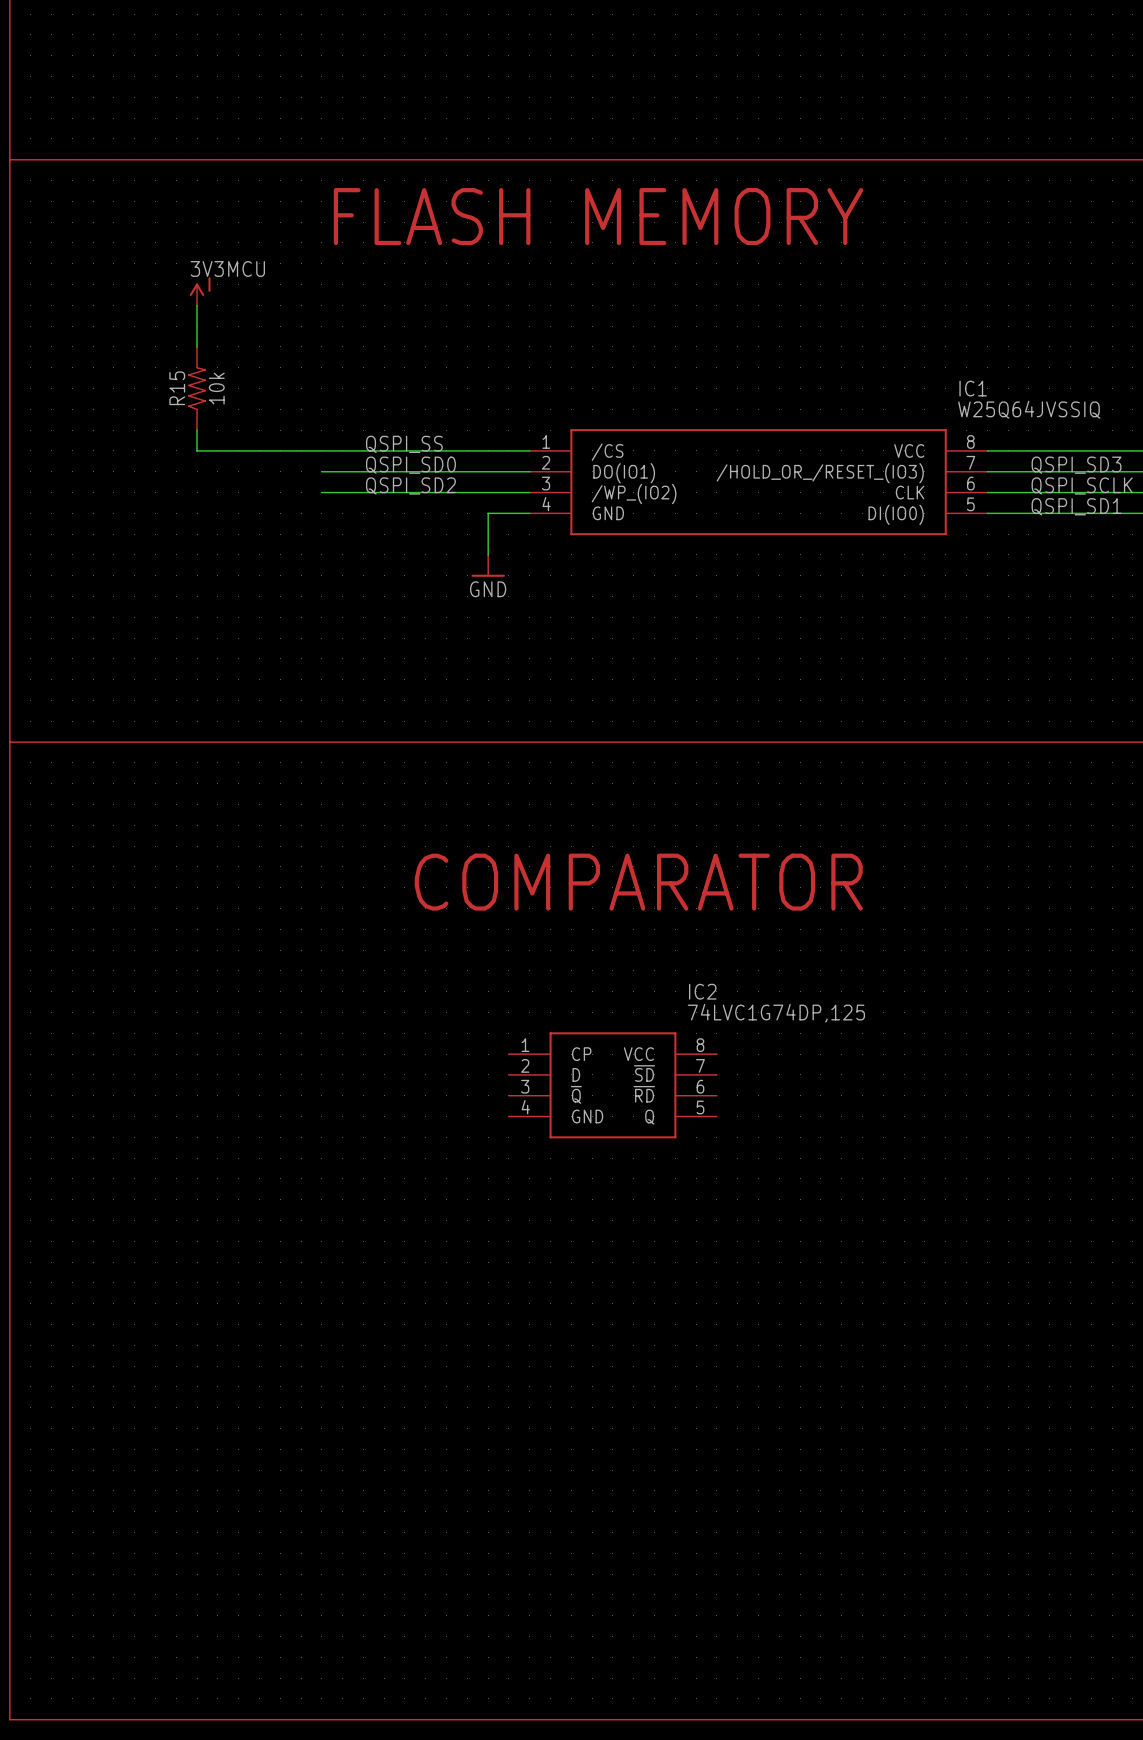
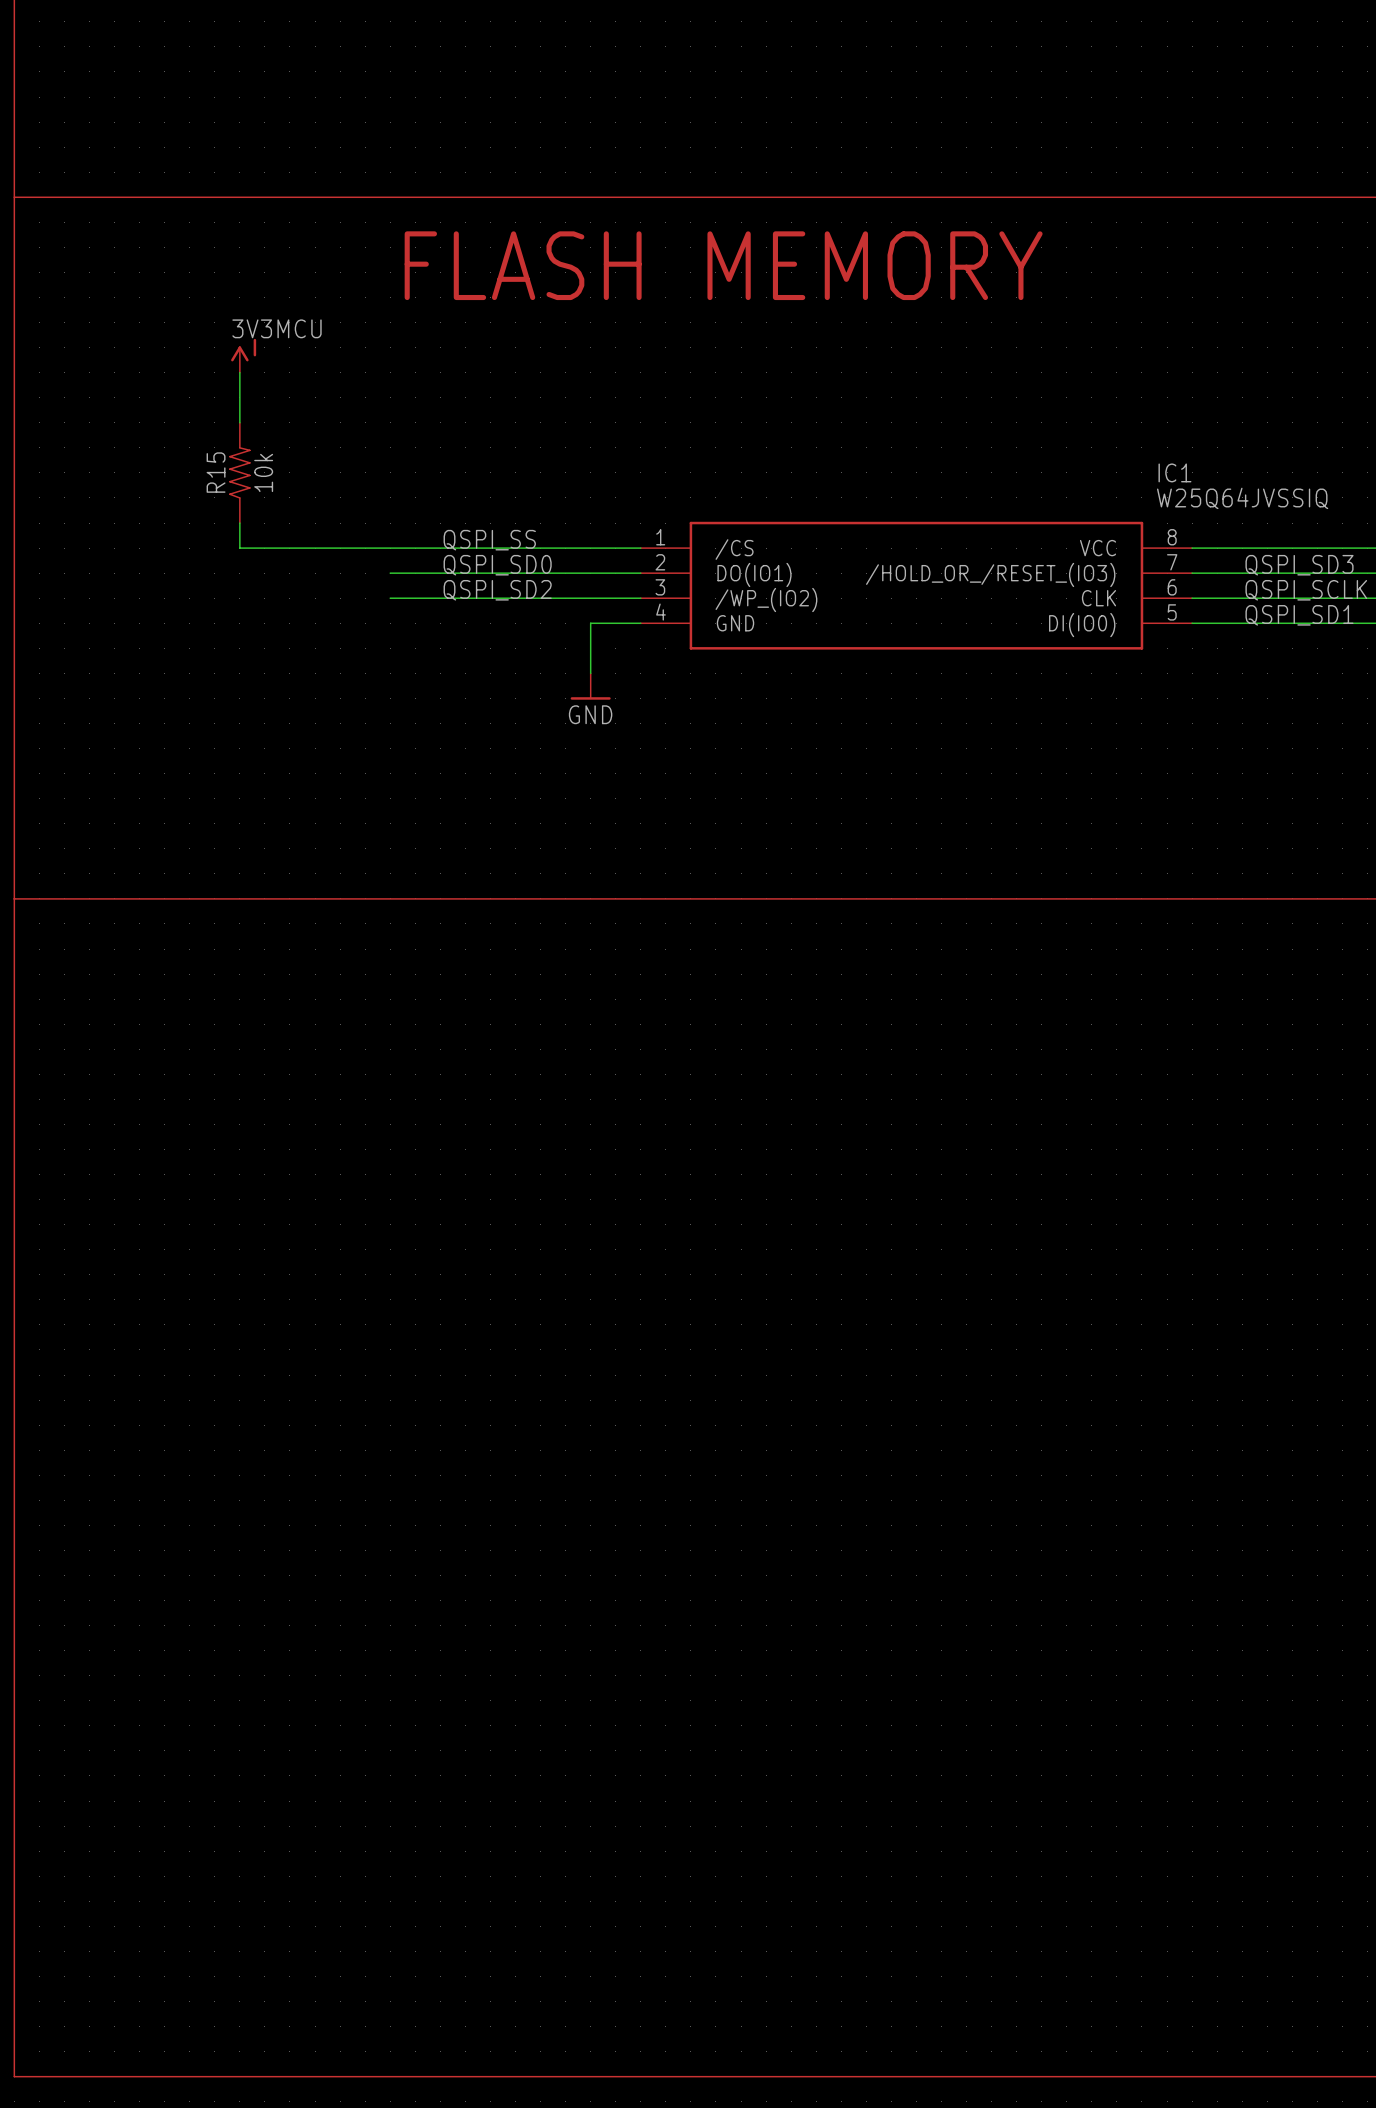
text: COMPARATOR (638, 882) -> none
IC2: 74LVC1G74DP,125 (612, 1085) -> none

